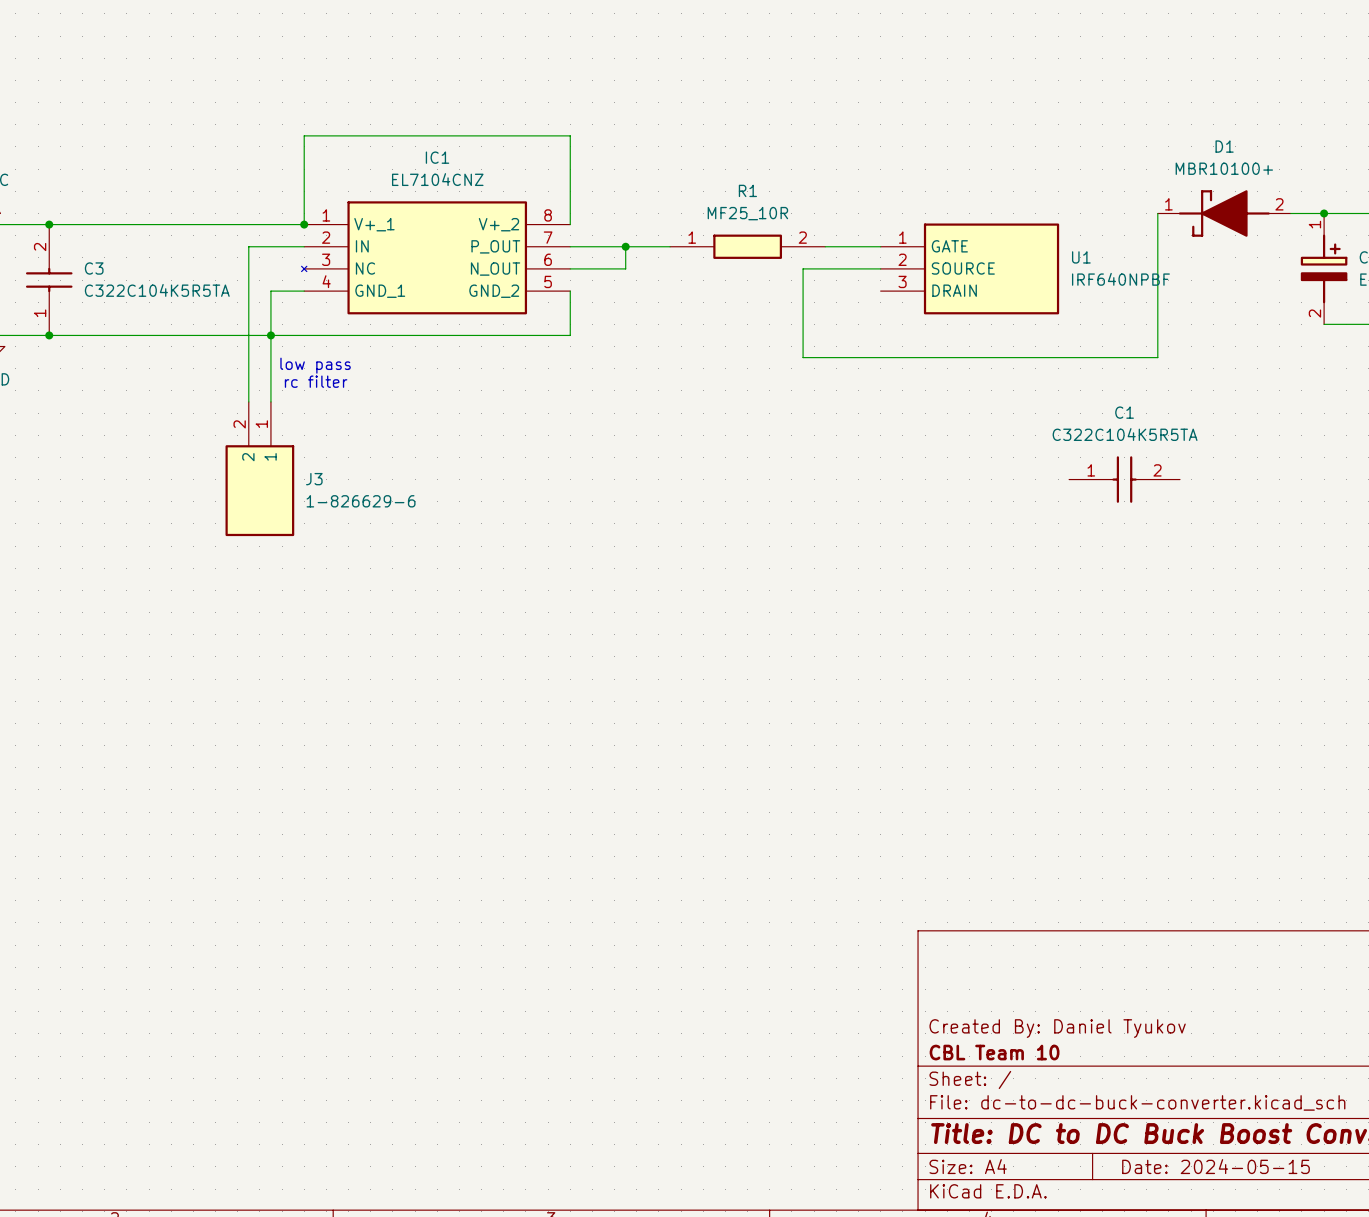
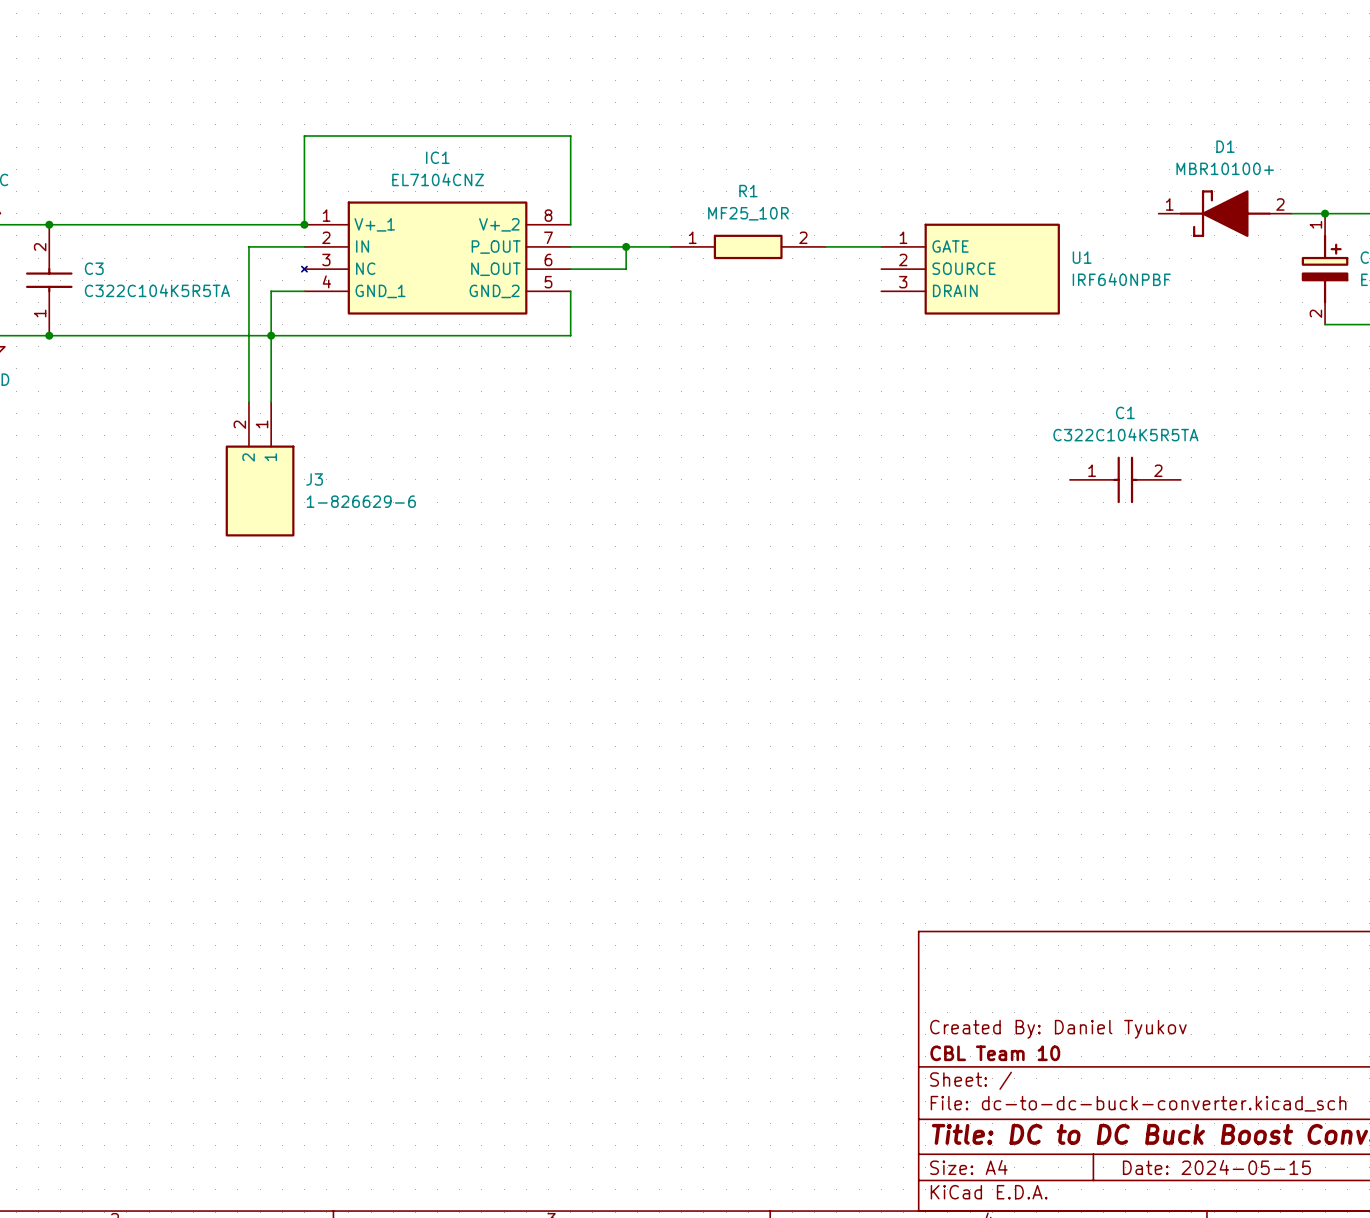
wire: (1157, 213) (1157, 357) (803, 357) (803, 268) (880, 268) -> none
text: low pass (315, 365) -> none
text: rc filter (316, 381) -> none

